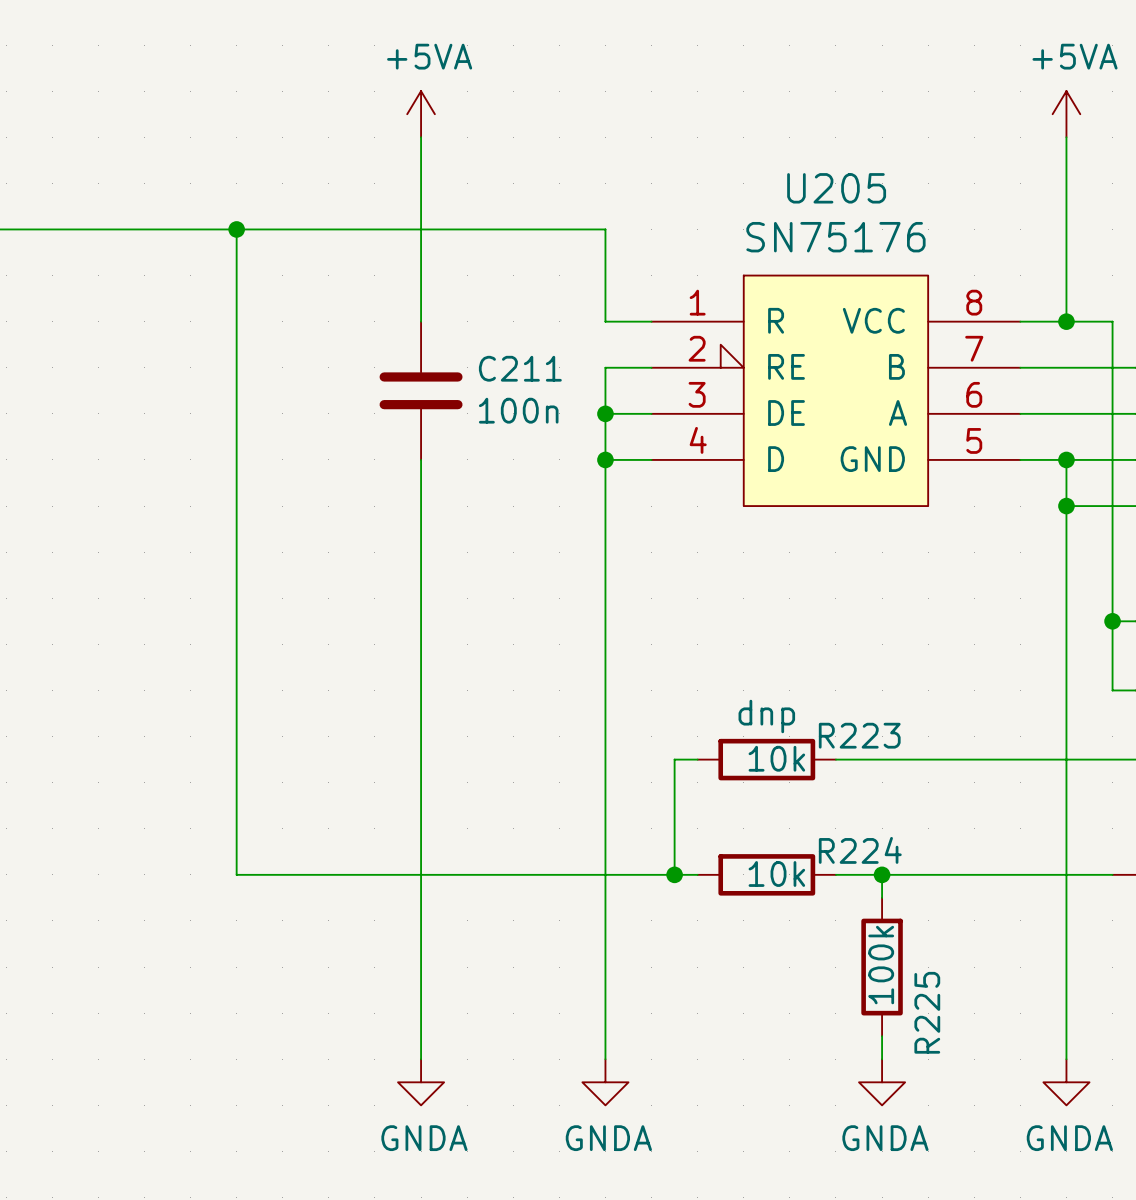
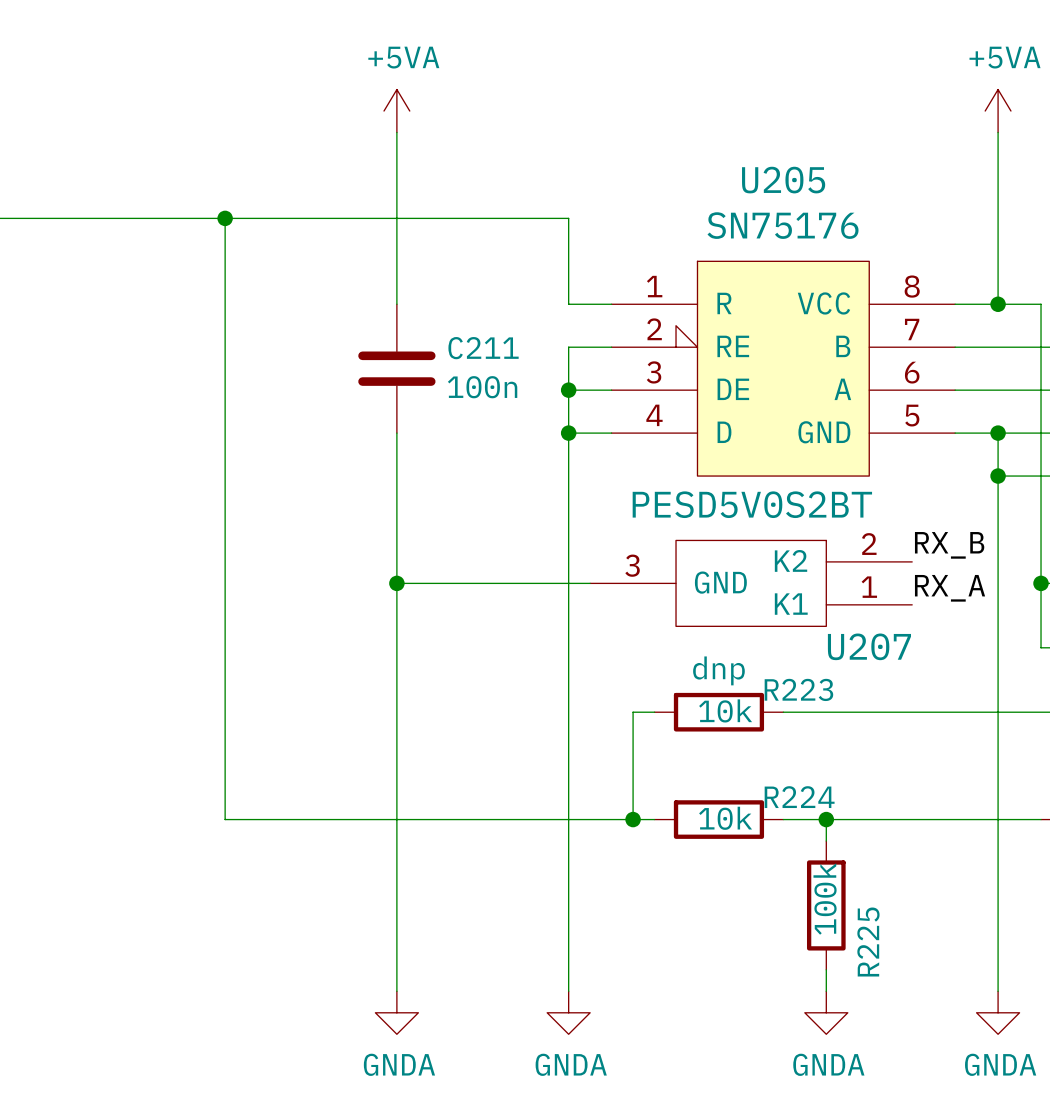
label: none -> RX_B (949, 545)
wire: none -> (396, 583) (590, 583)
junction: none -> (396, 583)
U207: none -> PESD5V0S2BT (751, 583)
label: none -> RX_A (950, 588)

